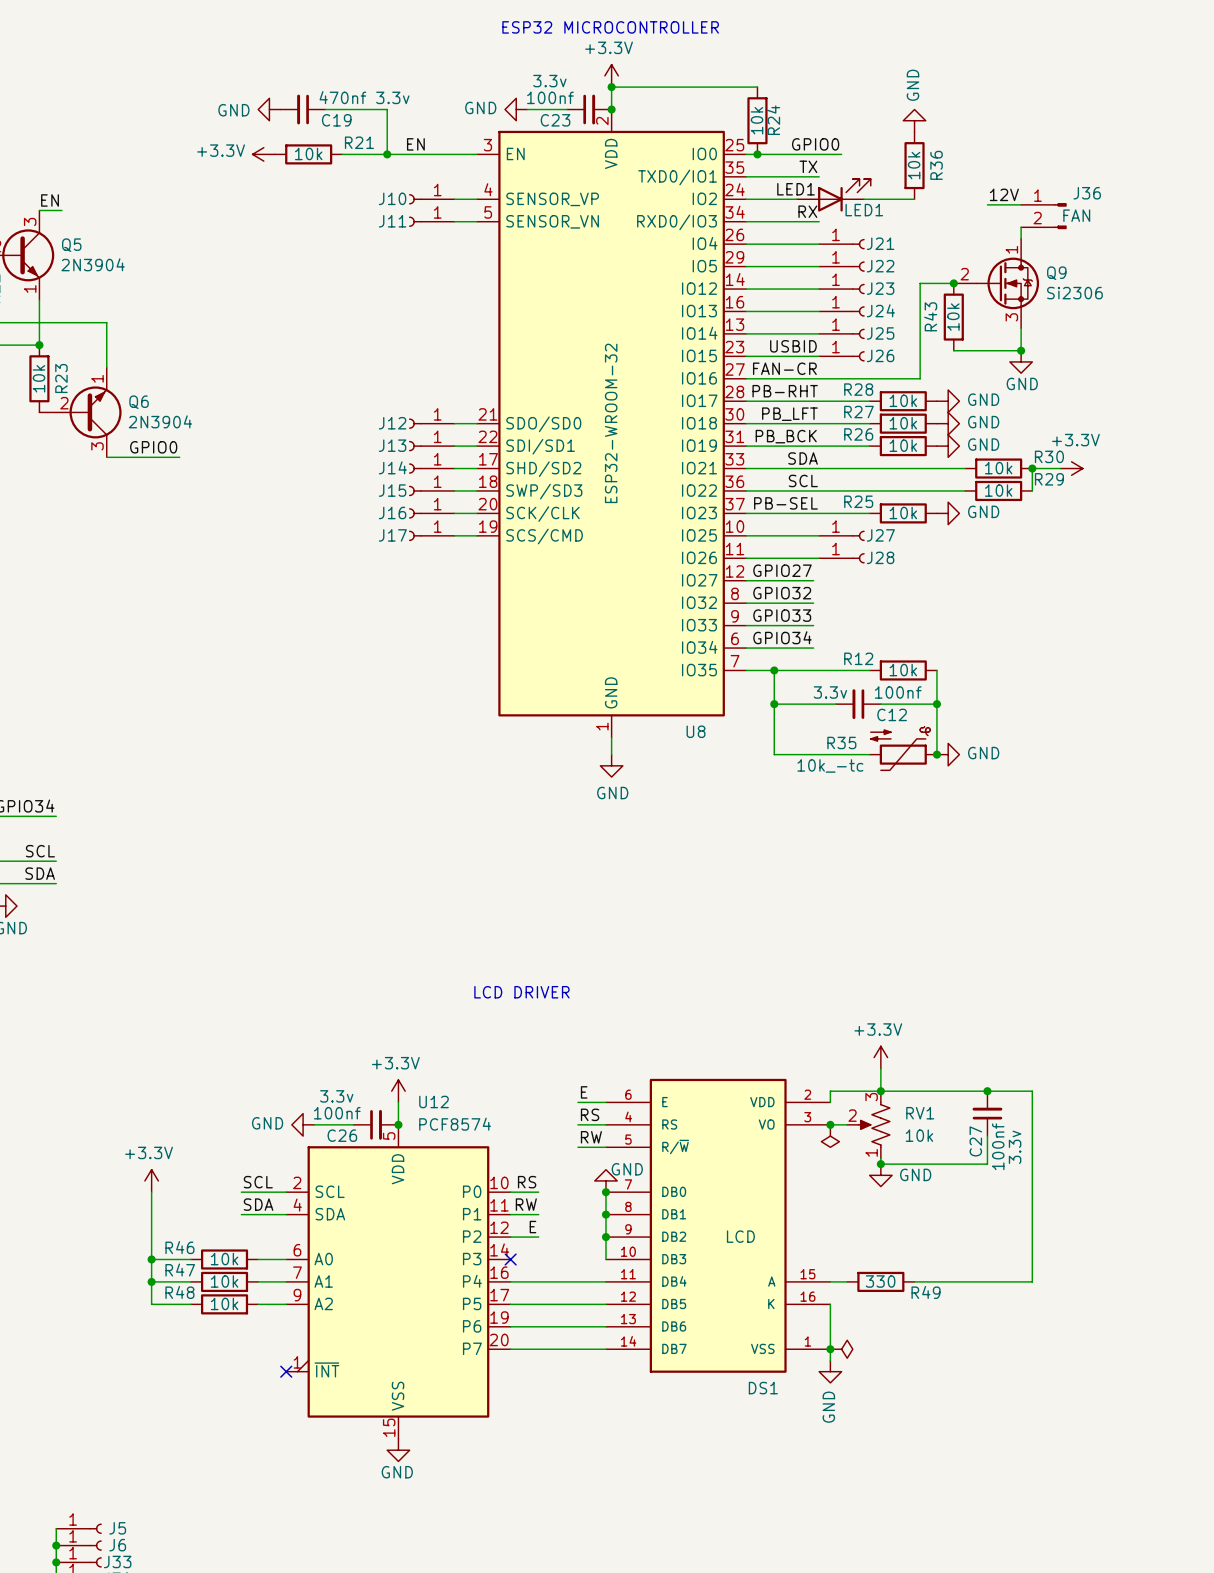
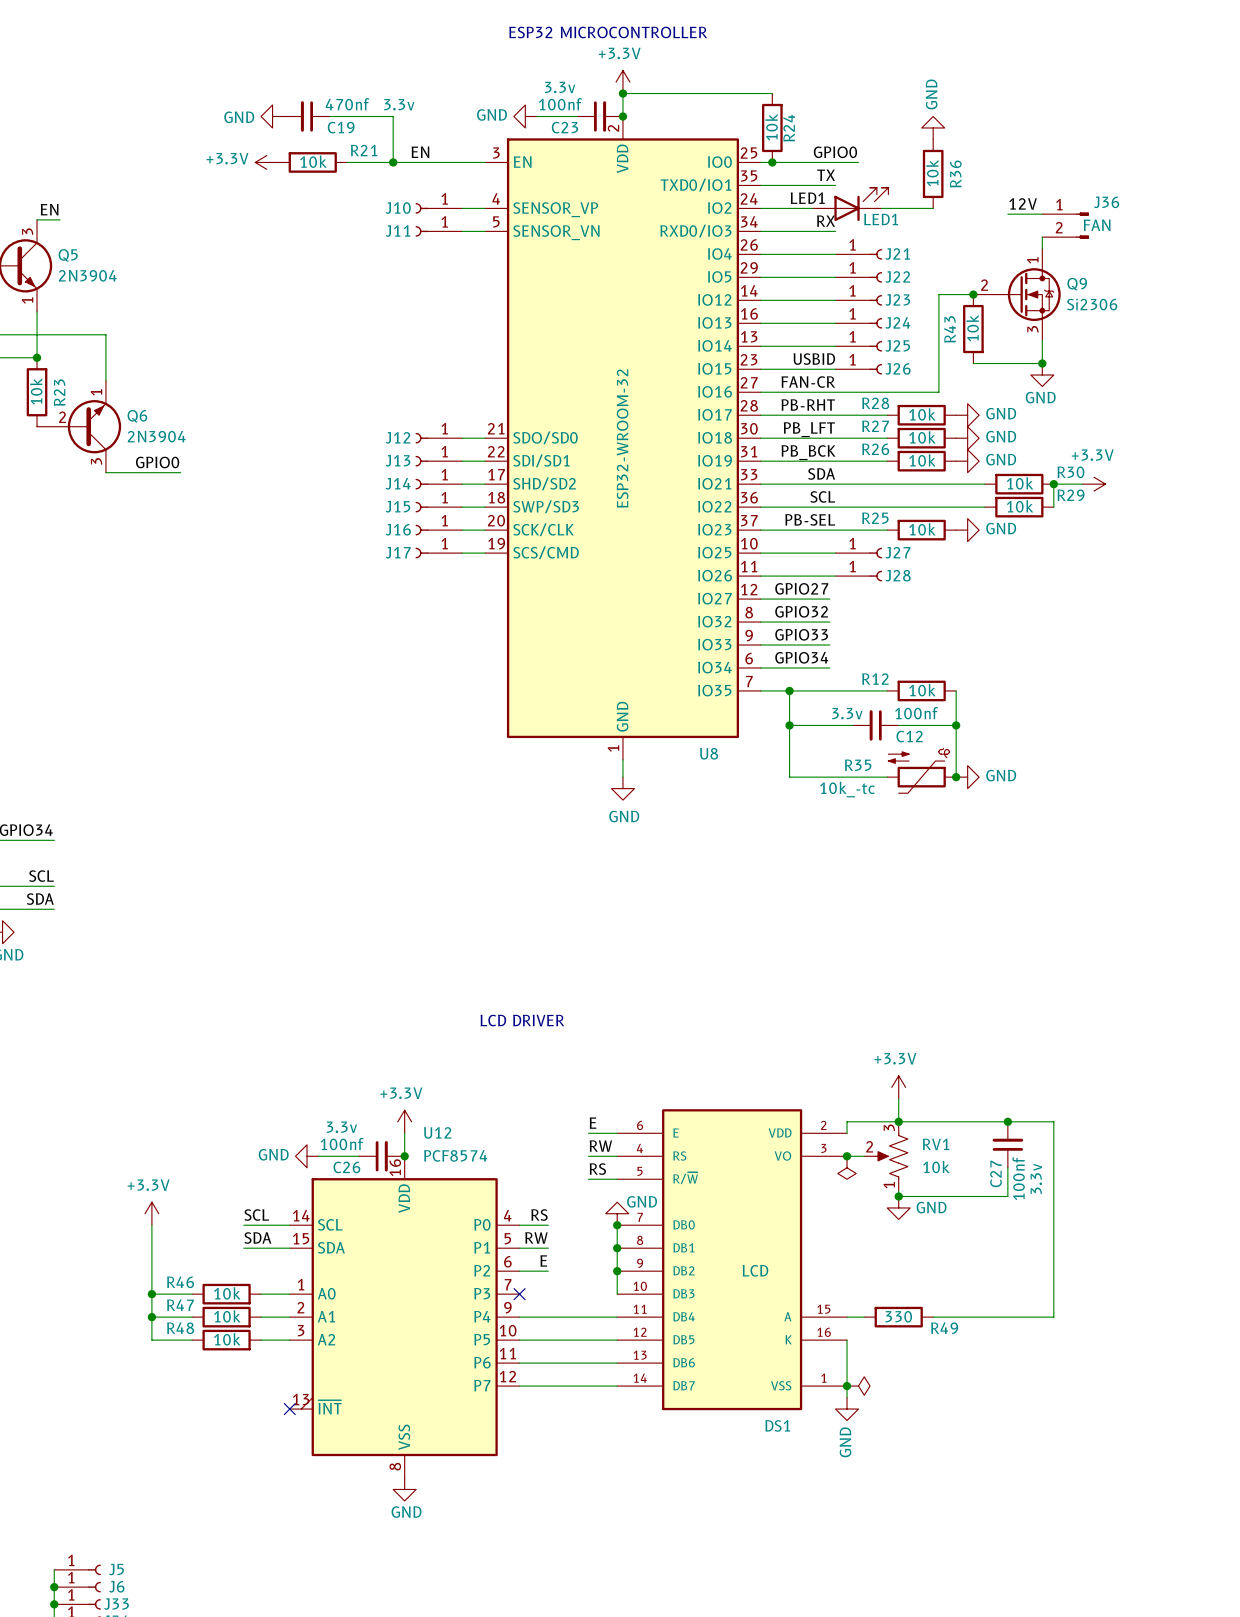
label: RS (590, 1114) -> RW (600, 1146)
U12 symbol: [286, 1124, 511, 1439] -> [289, 1156, 520, 1478]
label: RW (591, 1137) -> RS (597, 1169)

